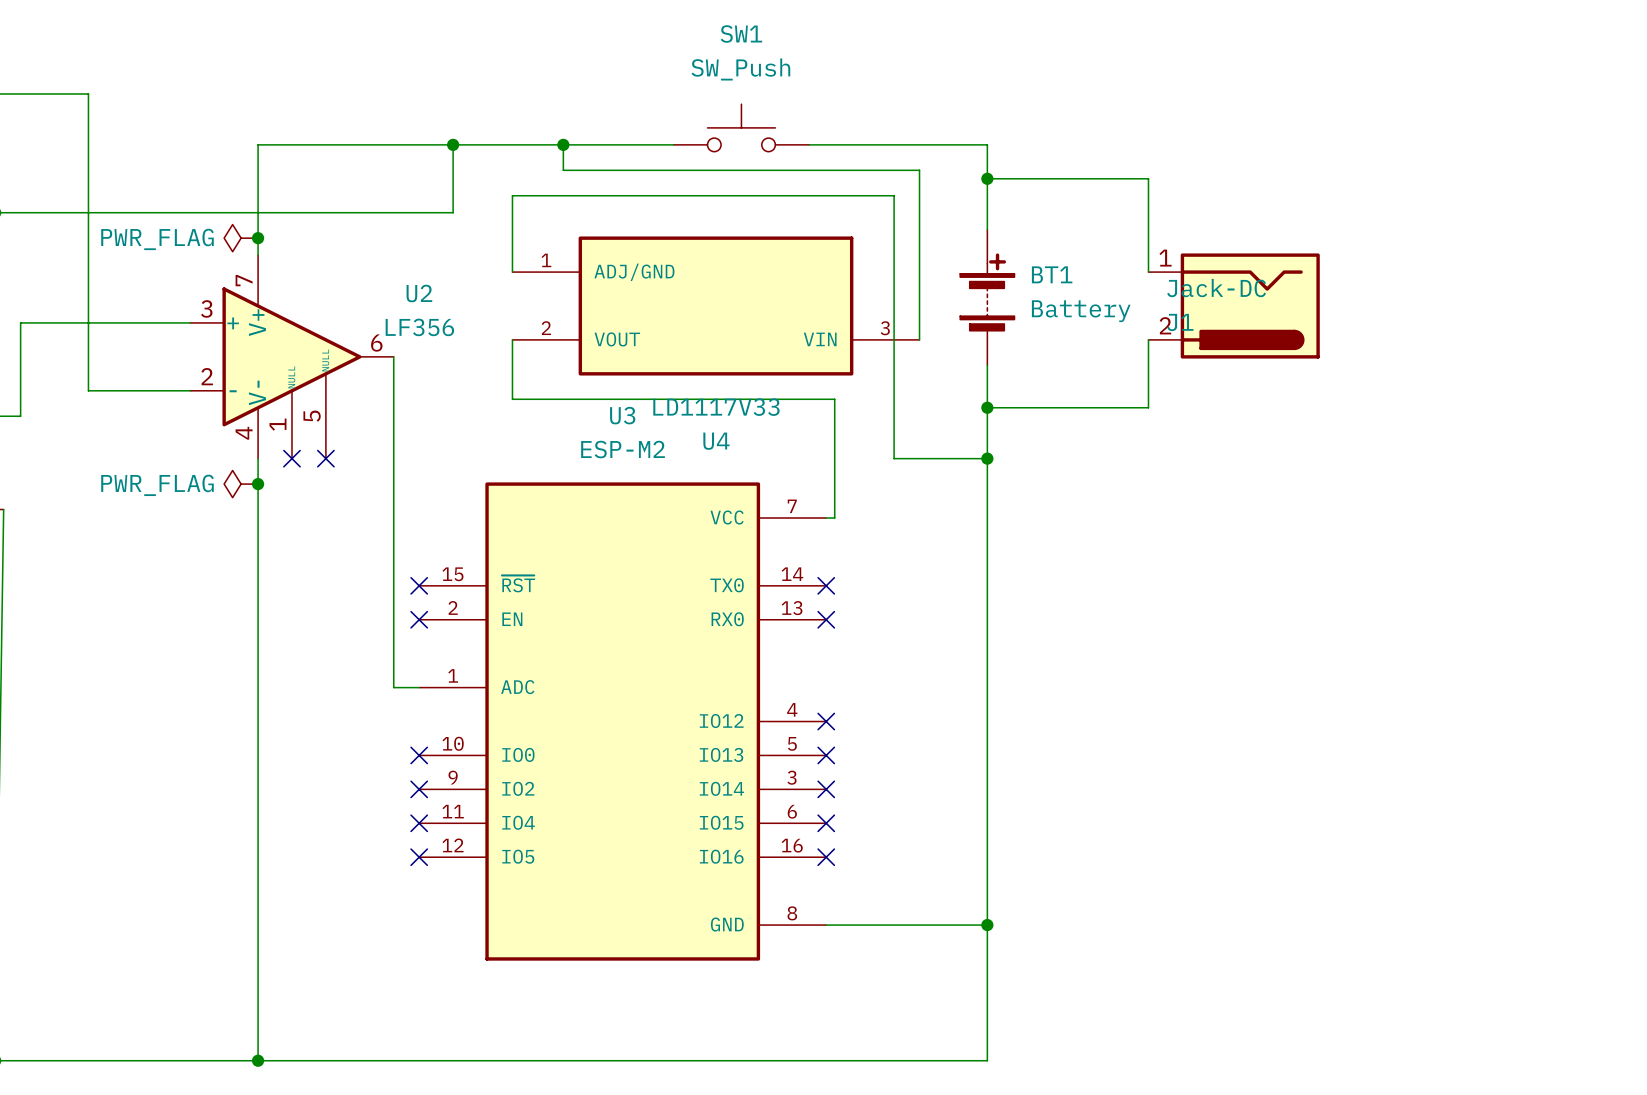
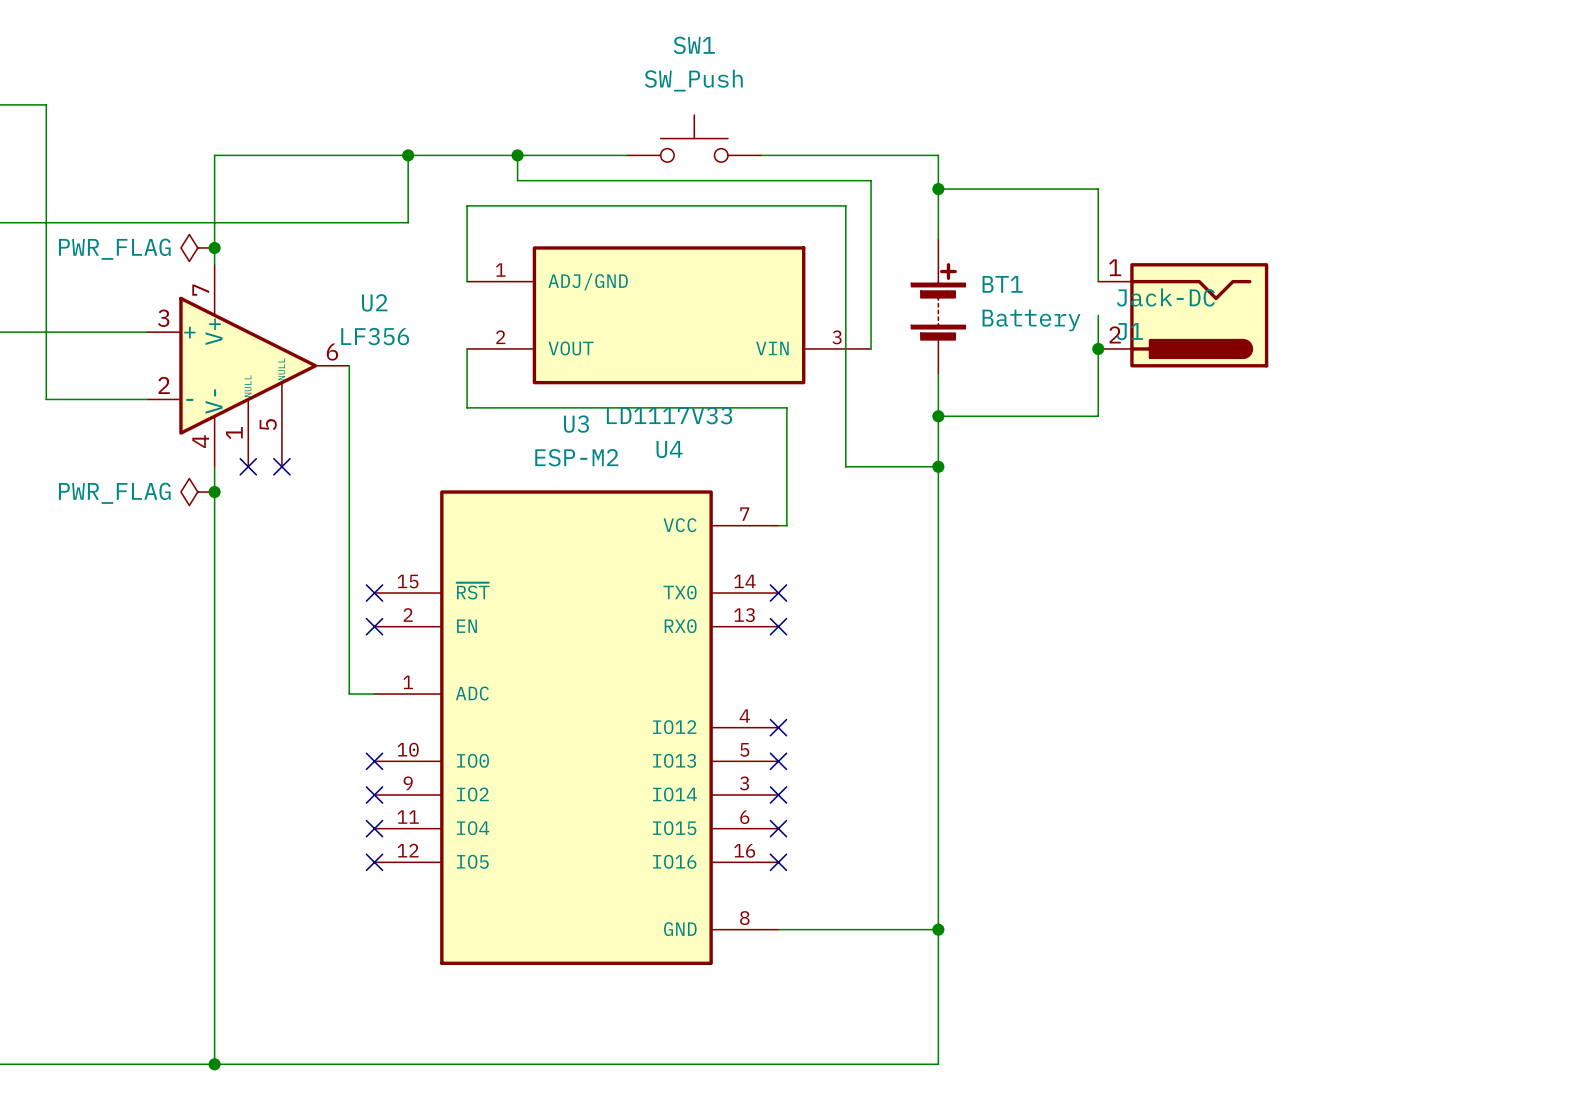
wire: none -> (1098, 315) (1098, 348)
junction: none -> (1098, 348)

